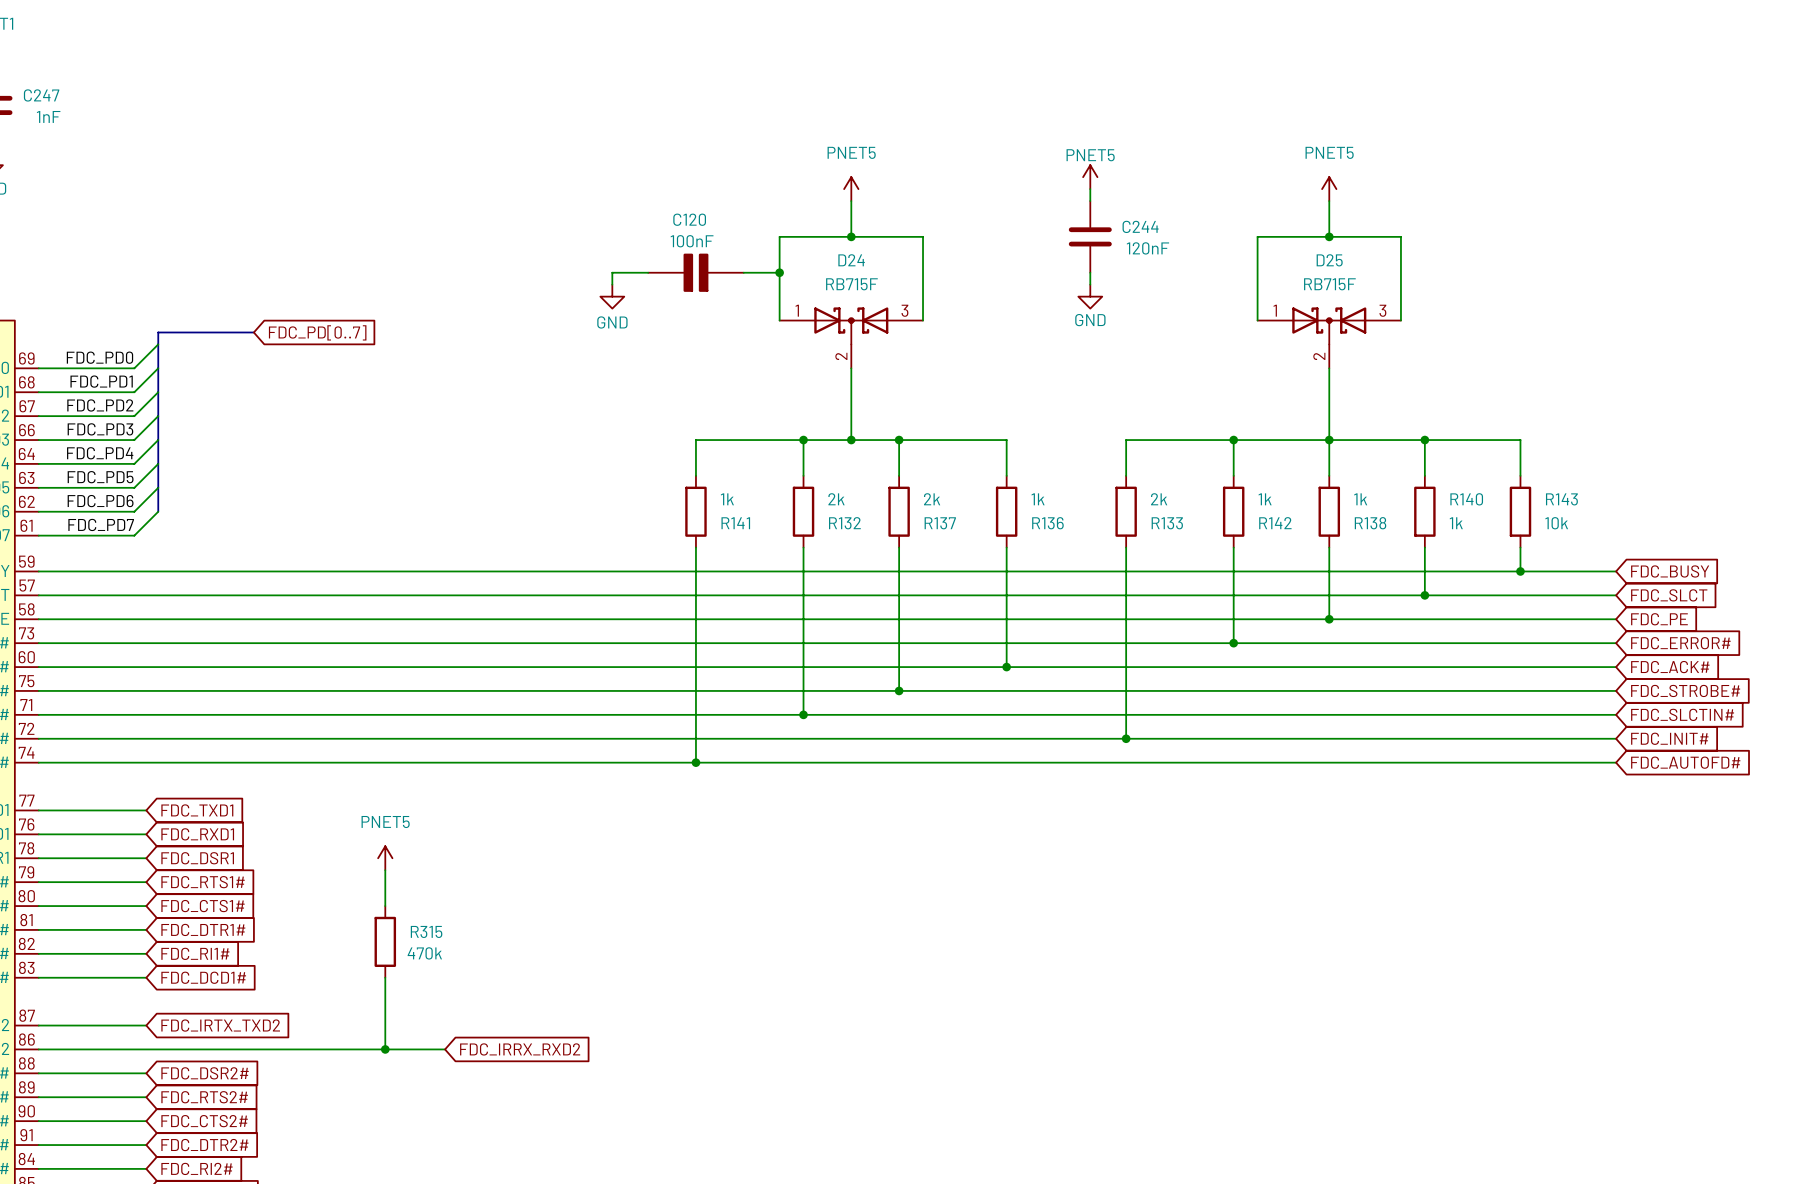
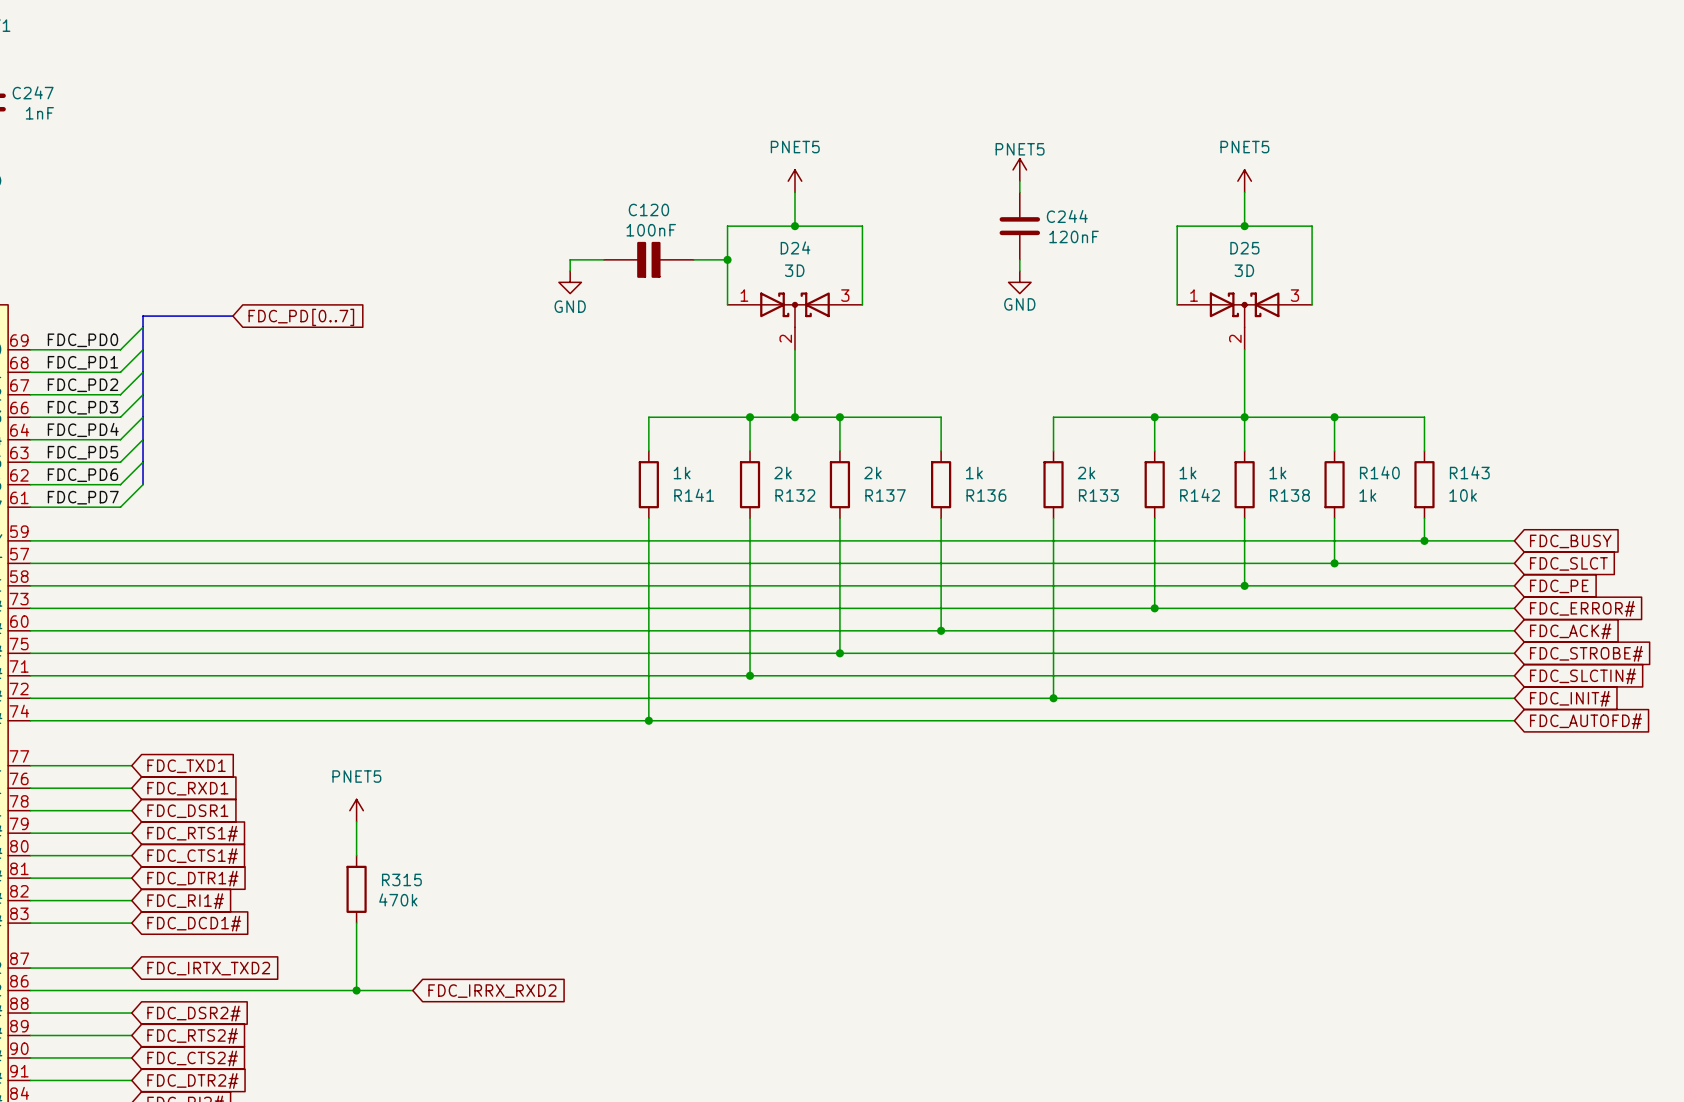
D24 value: RB715F (851, 284) -> 3D (794, 270)
D25 value: RB715F (1329, 284) -> 3D (1244, 270)

